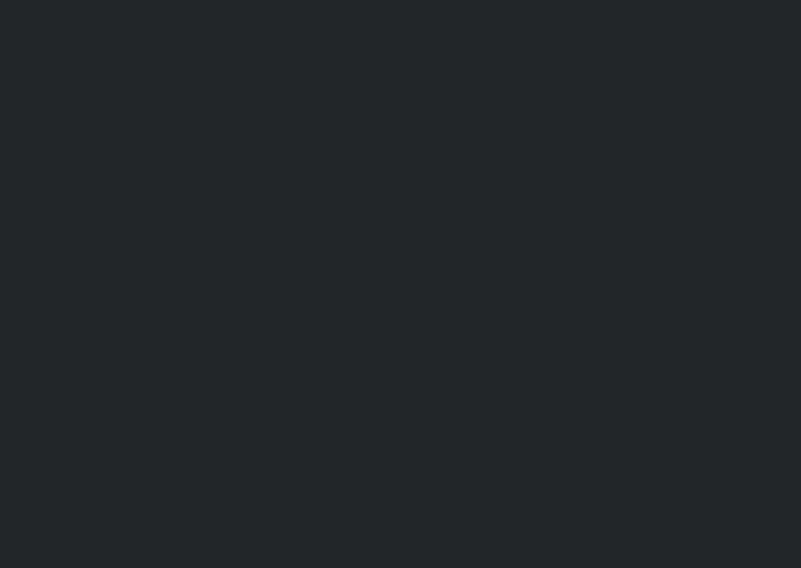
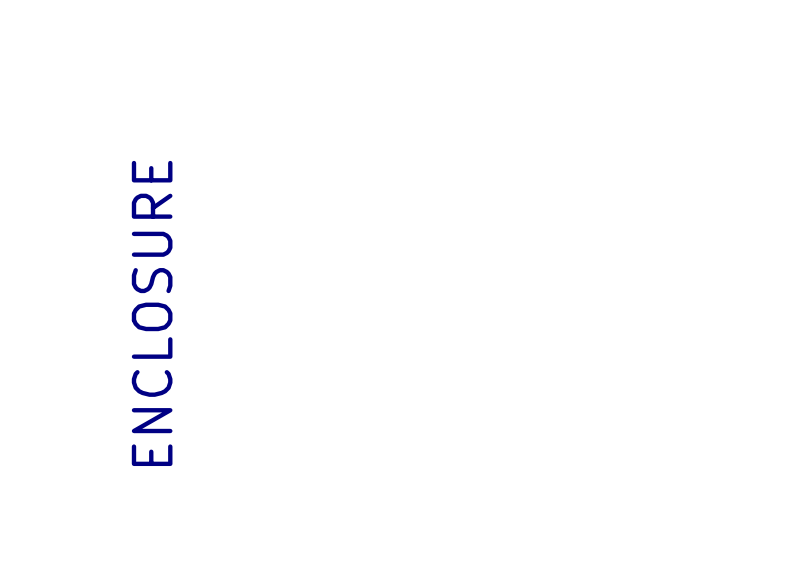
text: none -> ENCLOSURE (152, 313)

